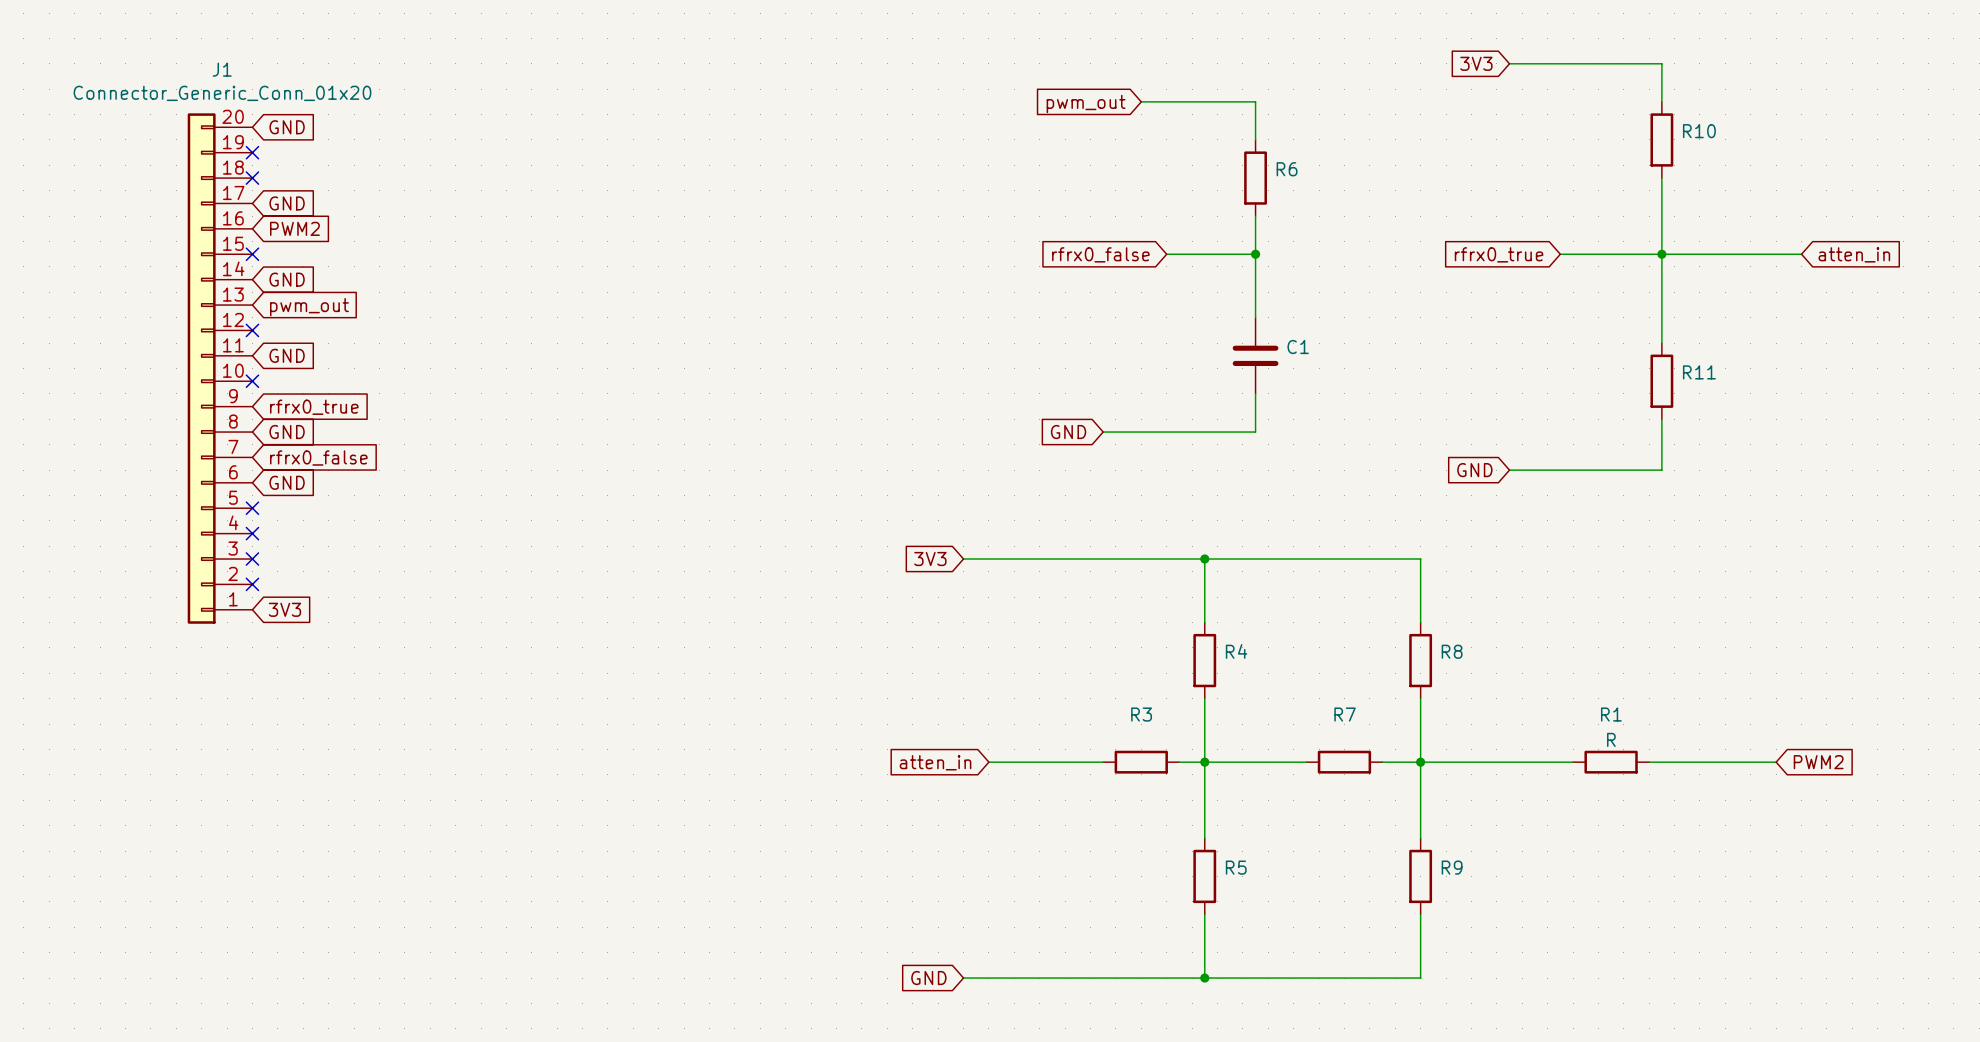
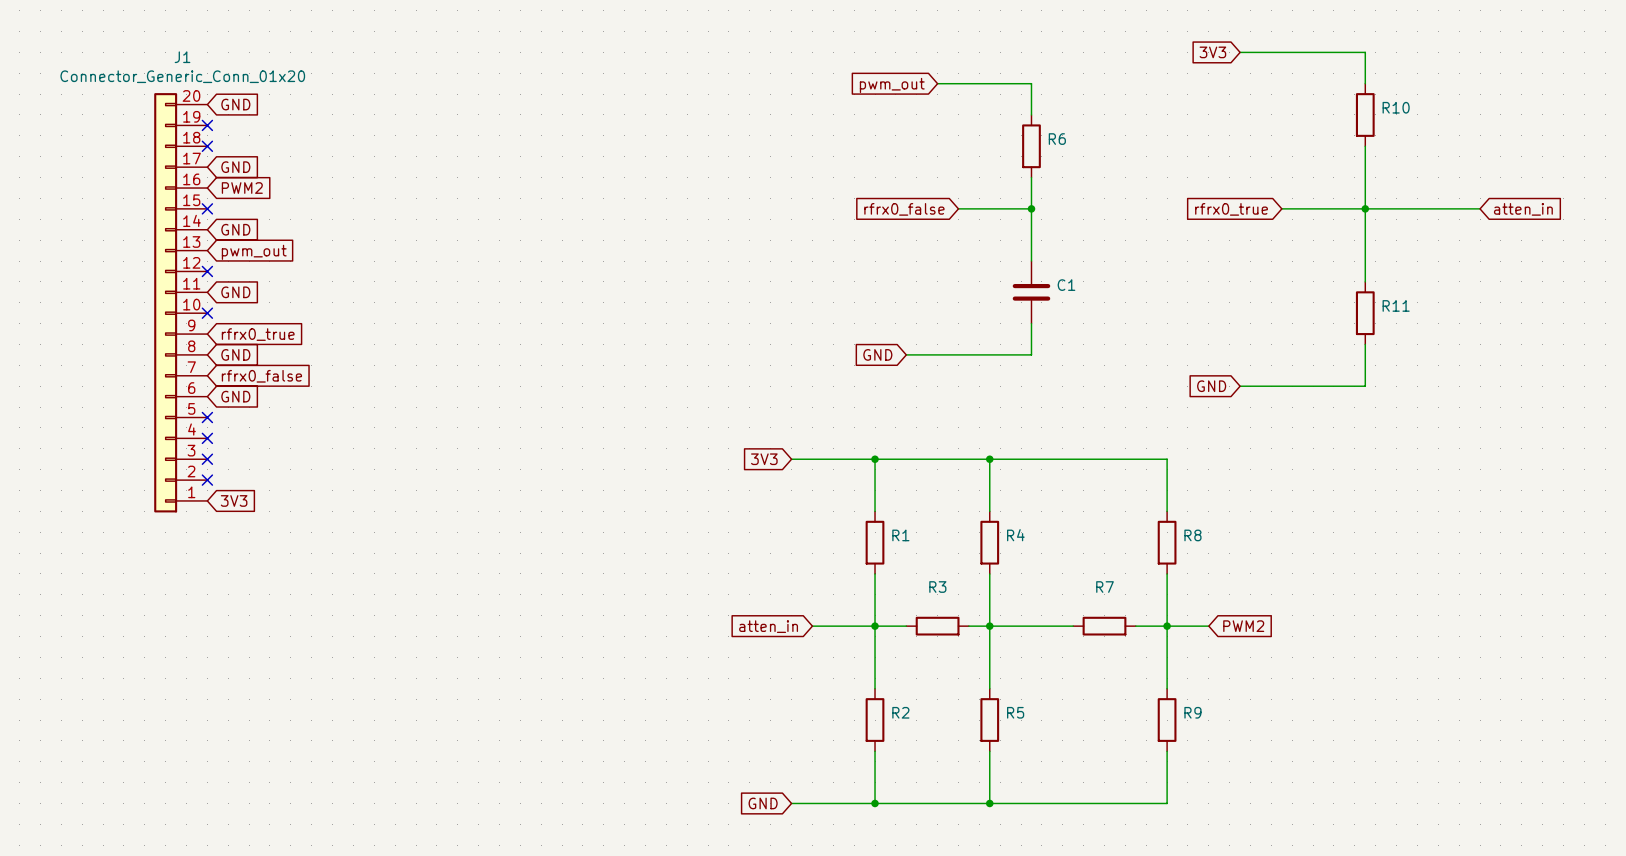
wire: none -> (875, 459) (875, 511)
junction: none -> (875, 459)
wire: none -> (875, 573) (875, 688)
R1 value: R (1611, 739) -> none
junction: none -> (875, 626)
wire: (1471, 762) (1573, 762) -> none
global label: none -> PWM2 (1243, 626)
R1 rotation: 0° (1611, 762) -> 90° clockwise (875, 542)
R1 position: (1611, 762) -> (875, 542)
wire: (1649, 762) (1776, 762) -> none
global label: PWM2 (1818, 762) -> none
R2: none -> (875, 720)
wire: none -> (875, 751) (875, 803)
junction: none -> (875, 803)

